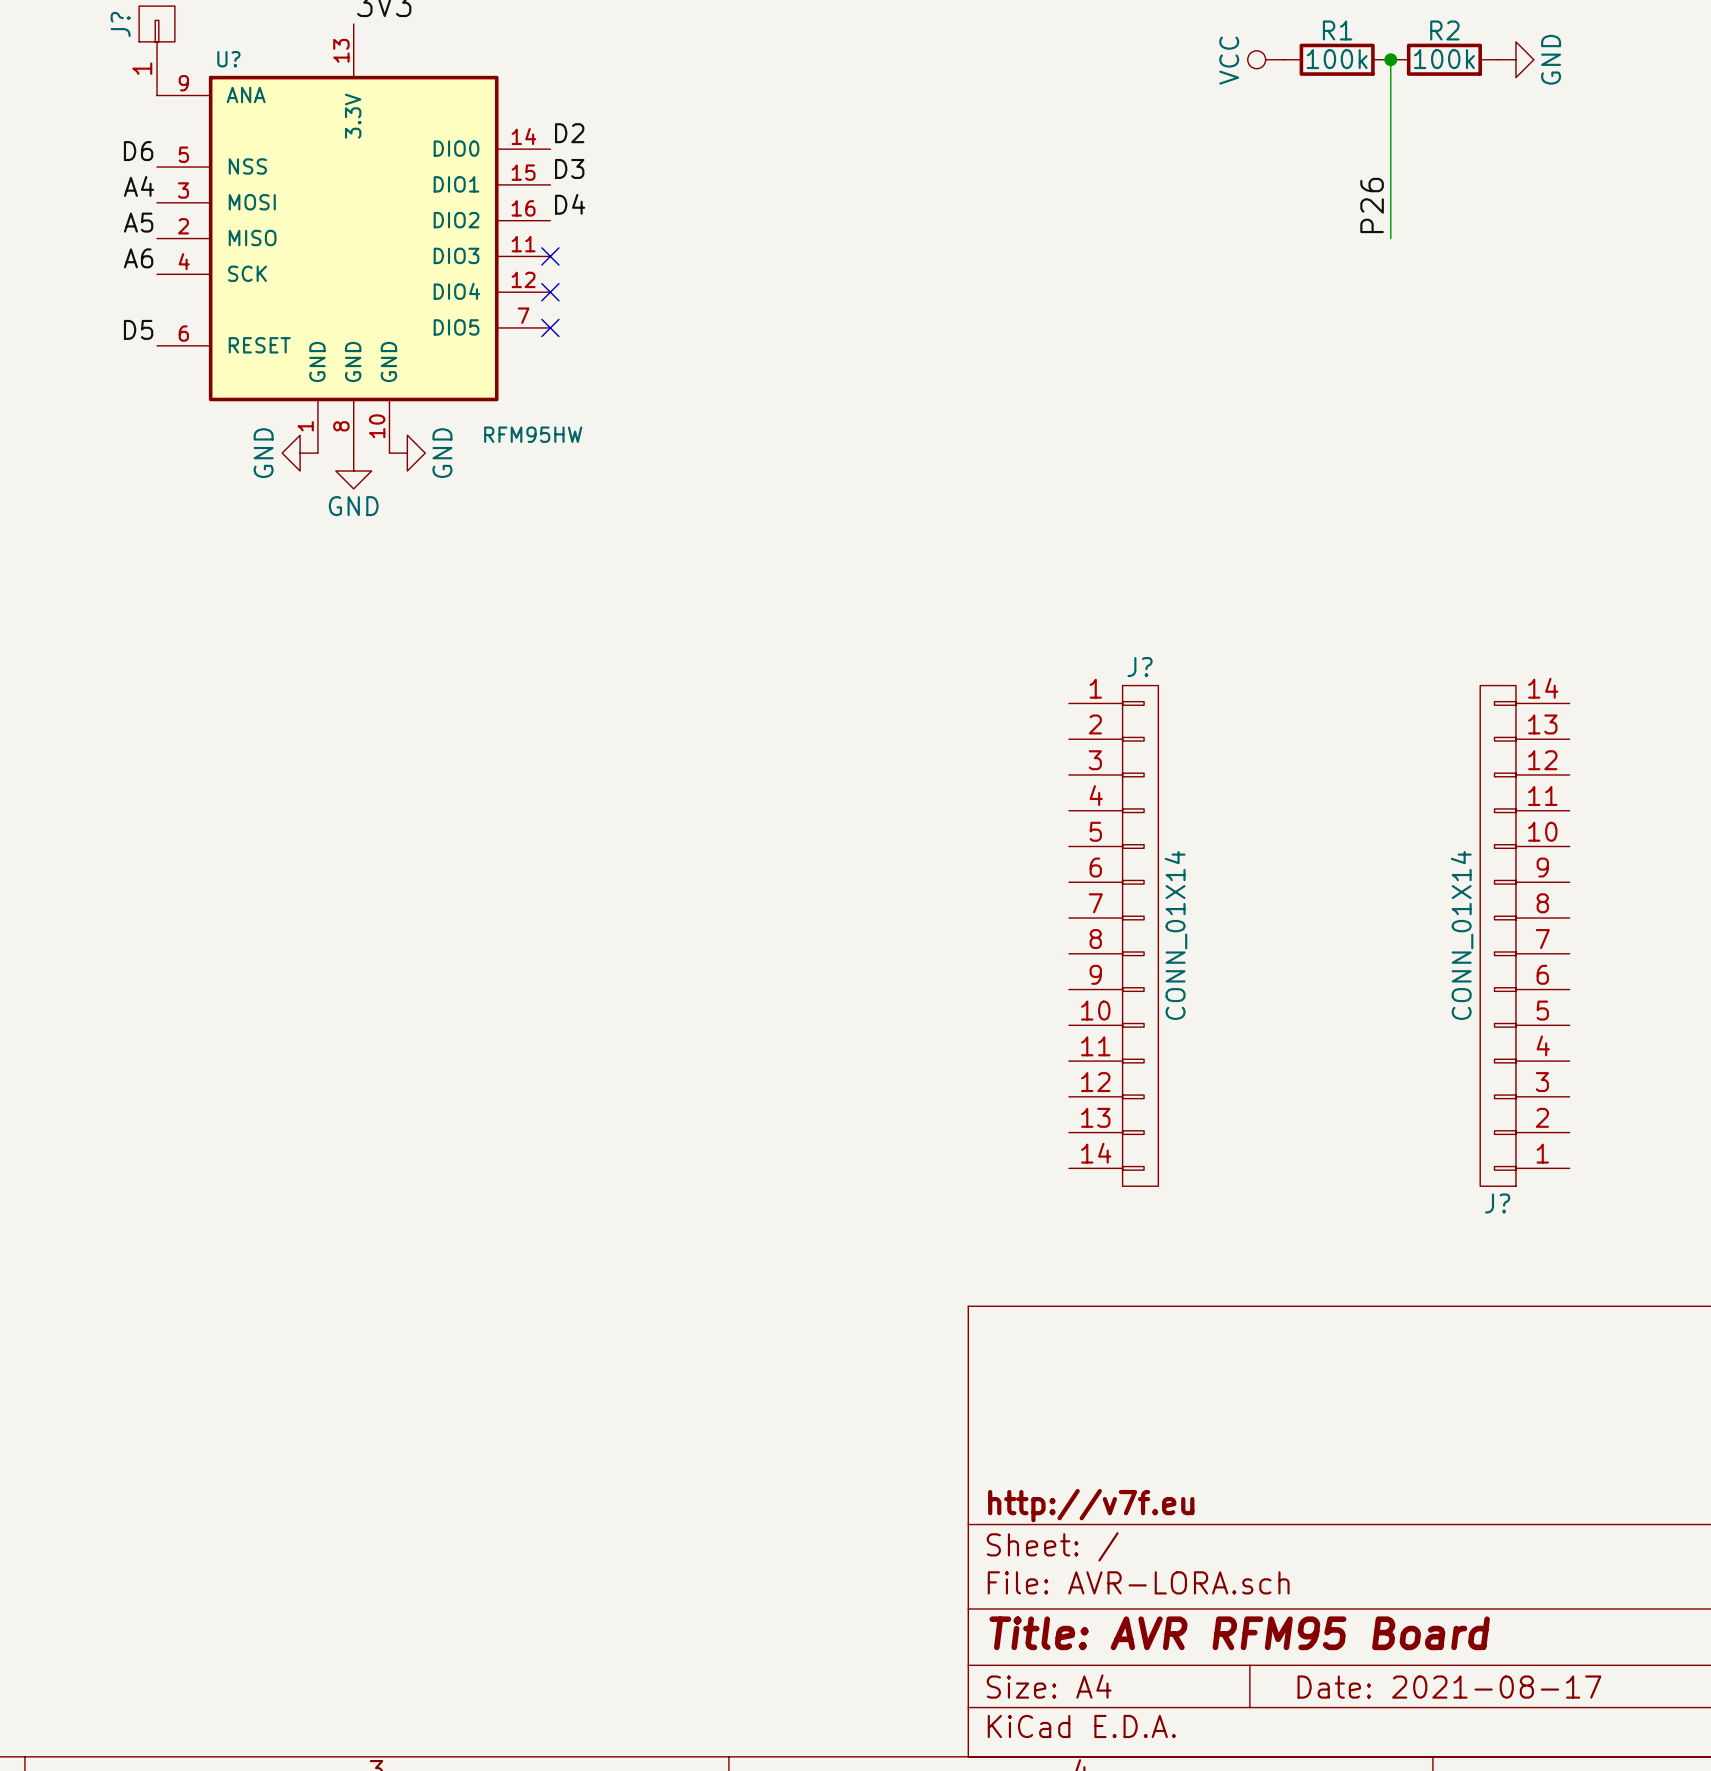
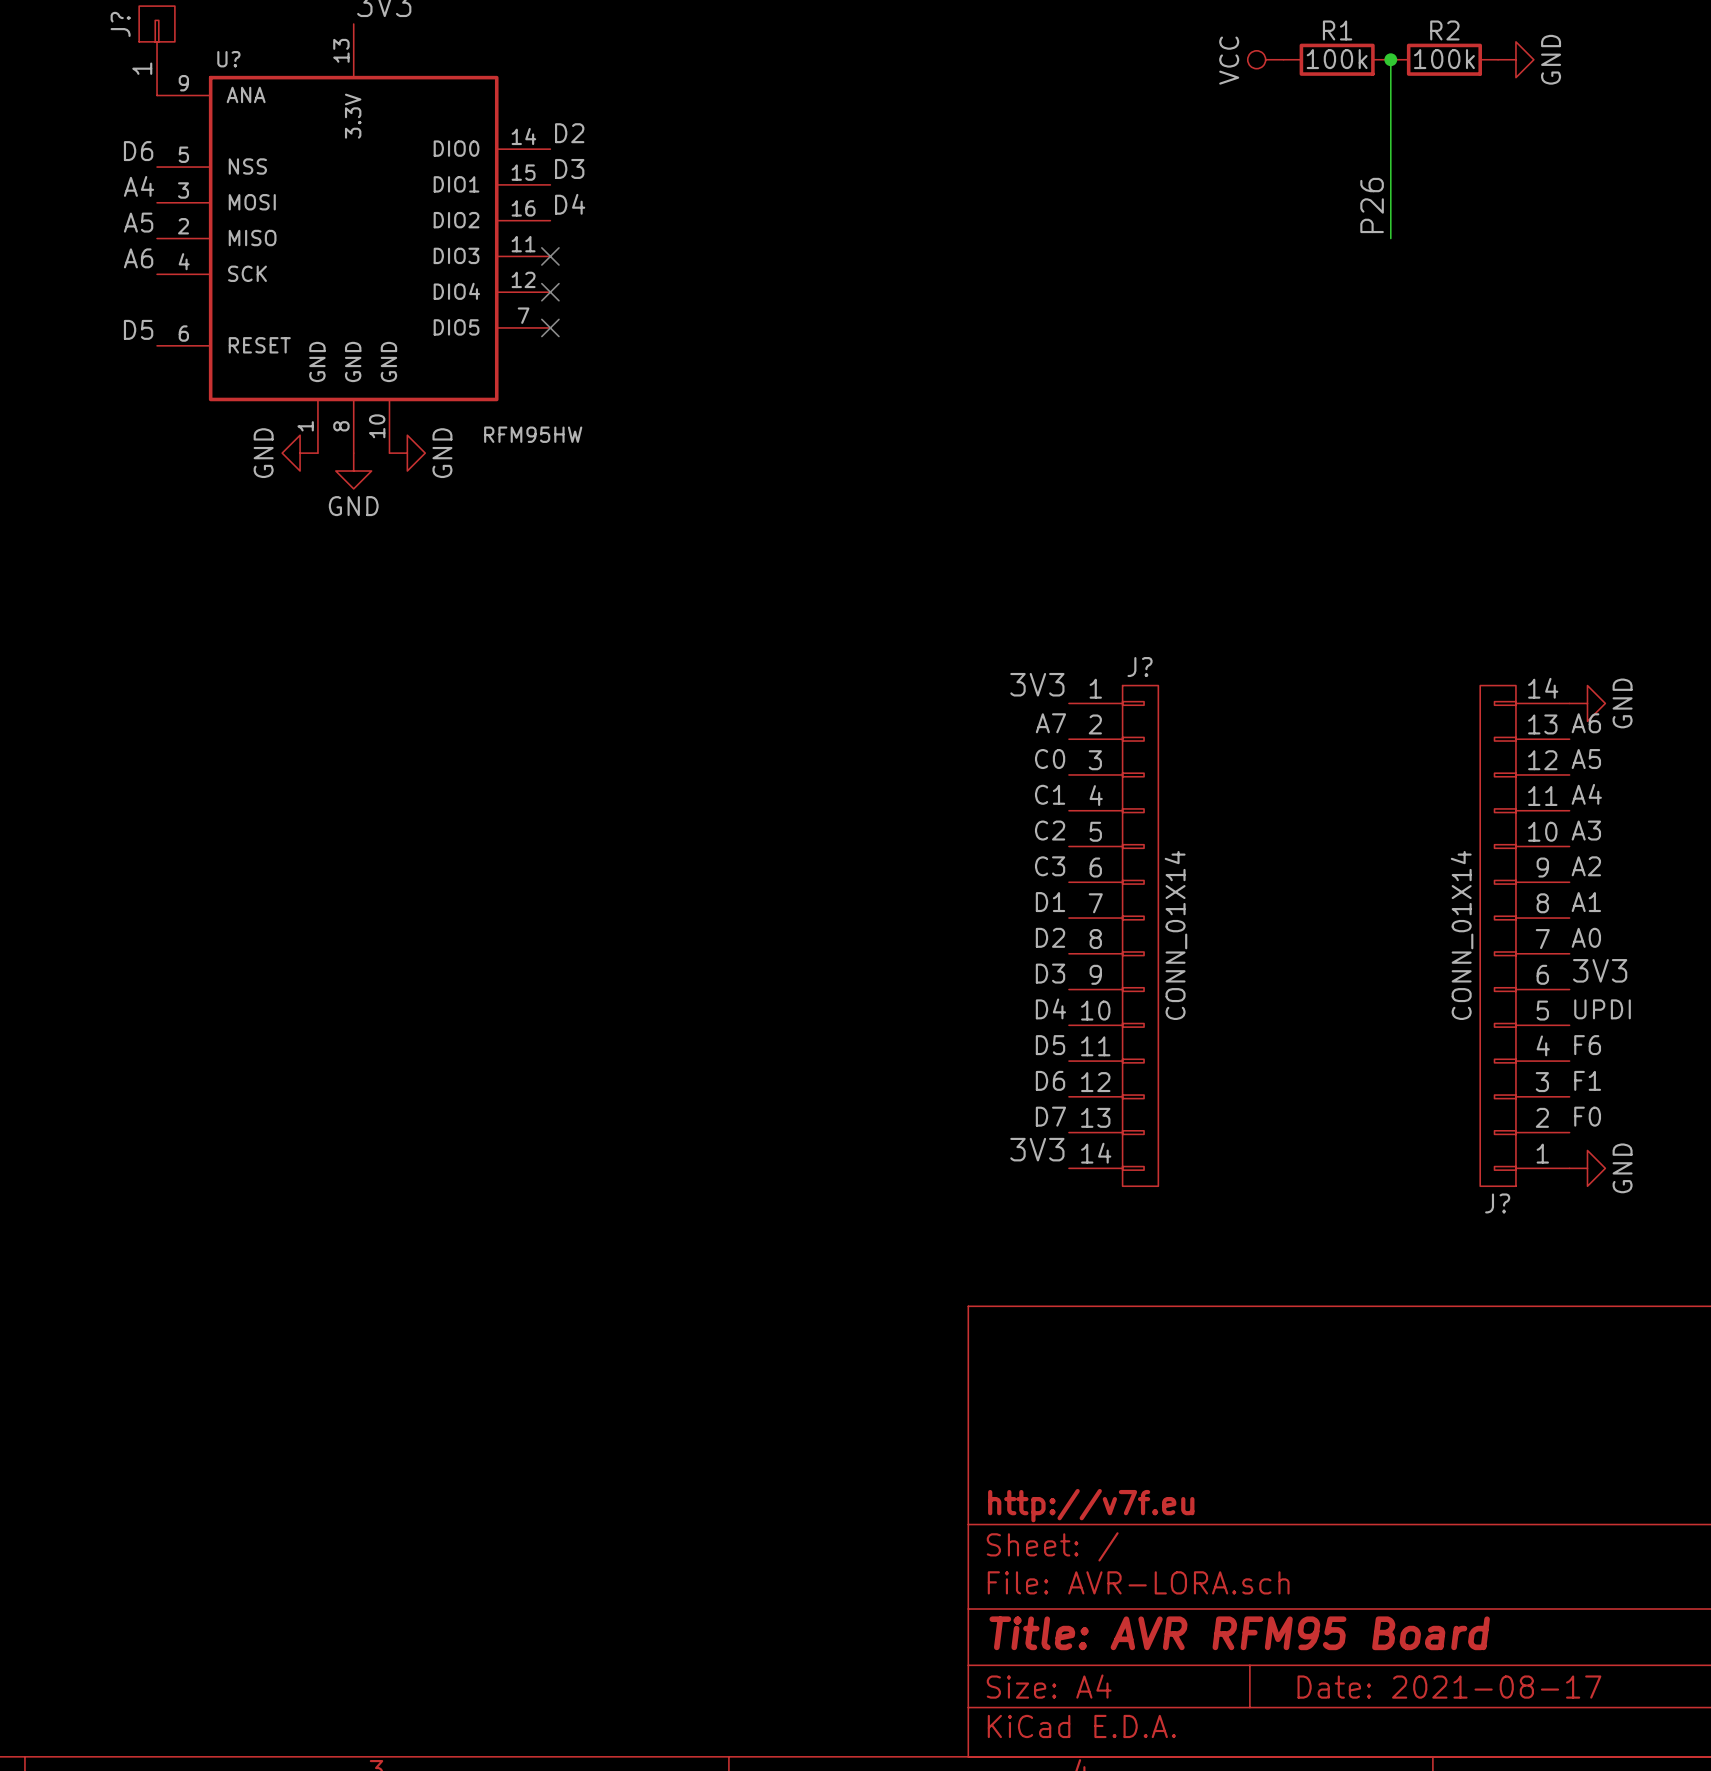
label: none -> 3V3 (1037, 684)
power symbol: none -> GND (1587, 703)
label: none -> A7 (1050, 723)
label: none -> A6 (1586, 723)
label: none -> C0 (1050, 759)
label: none -> A5 (1586, 759)
label: none -> C1 (1050, 794)
label: none -> A4 (1586, 794)
label: none -> C2 (1050, 830)
label: none -> A3 (1586, 830)
label: none -> C3 (1050, 866)
label: none -> A2 (1586, 866)
label: none -> D1 (1050, 902)
label: none -> A1 (1586, 902)
label: none -> D2 (1050, 937)
label: none -> A0 (1586, 937)
label: none -> 3V3 (1600, 970)
label: none -> D3 (1050, 973)
label: none -> D4 (1050, 1008)
label: none -> UPDI (1602, 1009)
label: none -> D5 (1050, 1045)
label: none -> F6 (1587, 1045)
label: none -> D6 (1050, 1080)
label: none -> F1 (1587, 1080)
label: none -> D7 (1050, 1116)
label: none -> F0 (1587, 1116)
label: none -> 3V3 (1037, 1149)
power symbol: none -> GND (1587, 1168)

